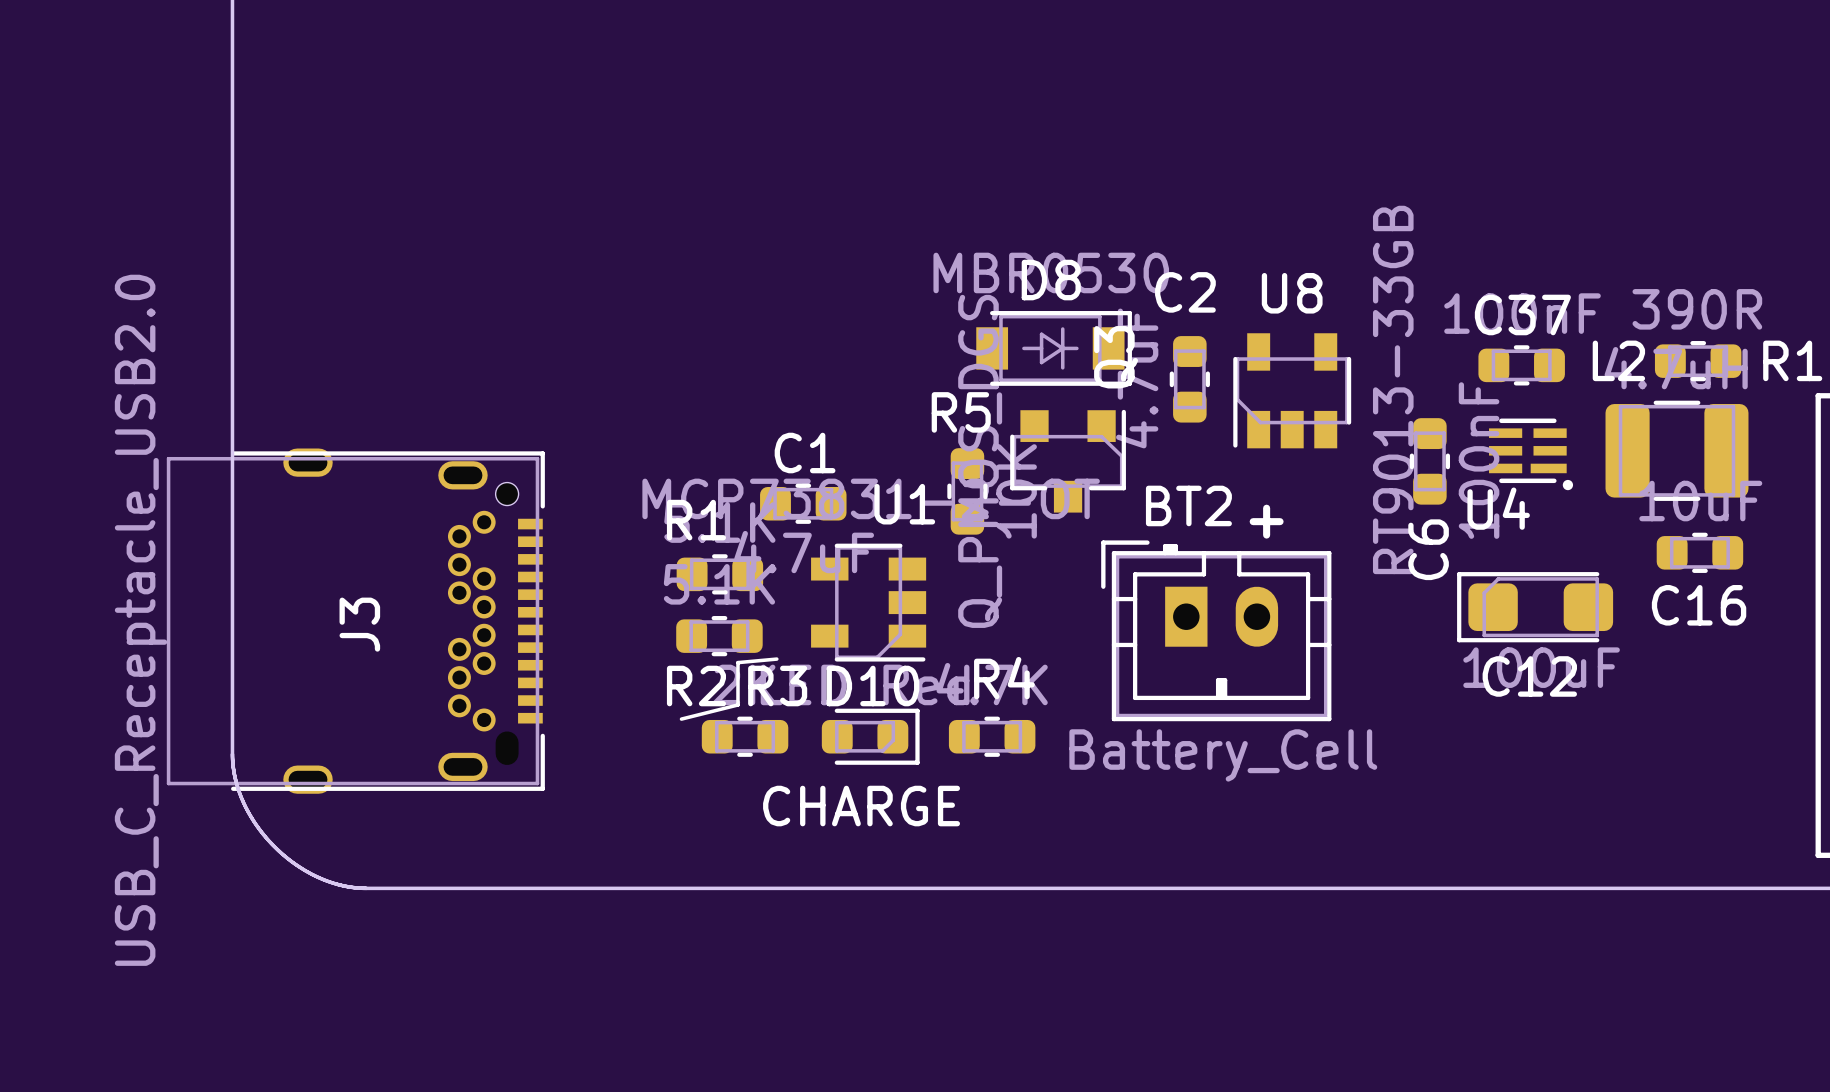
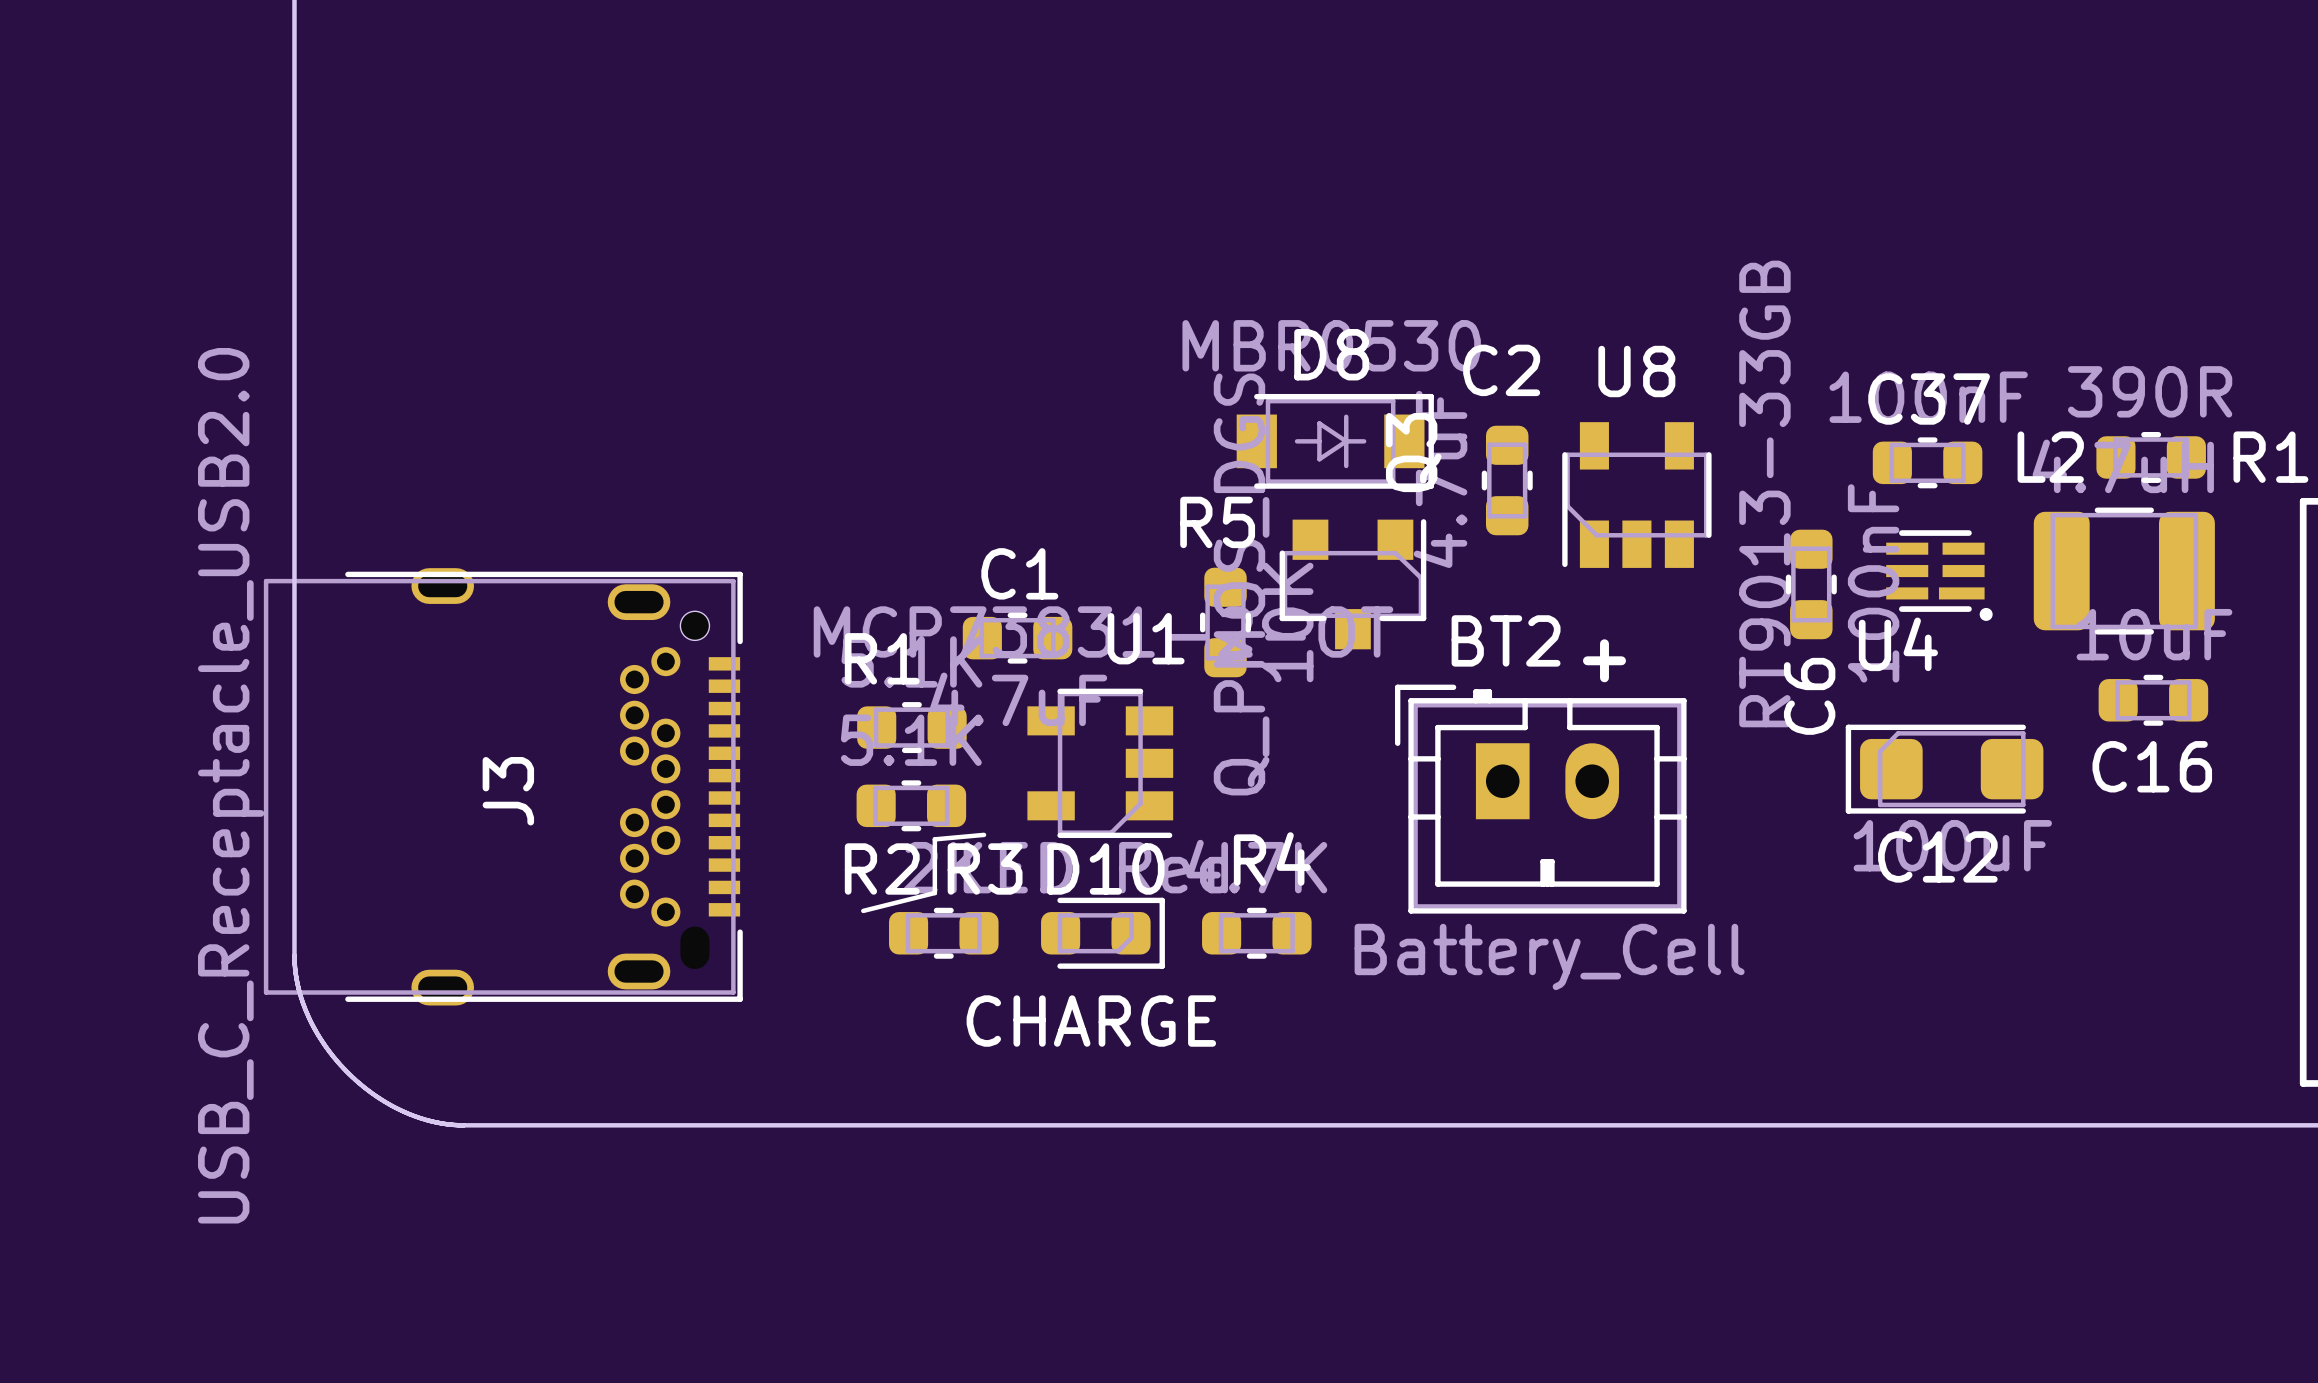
J3 position: (355, 621) -> (503, 786)

